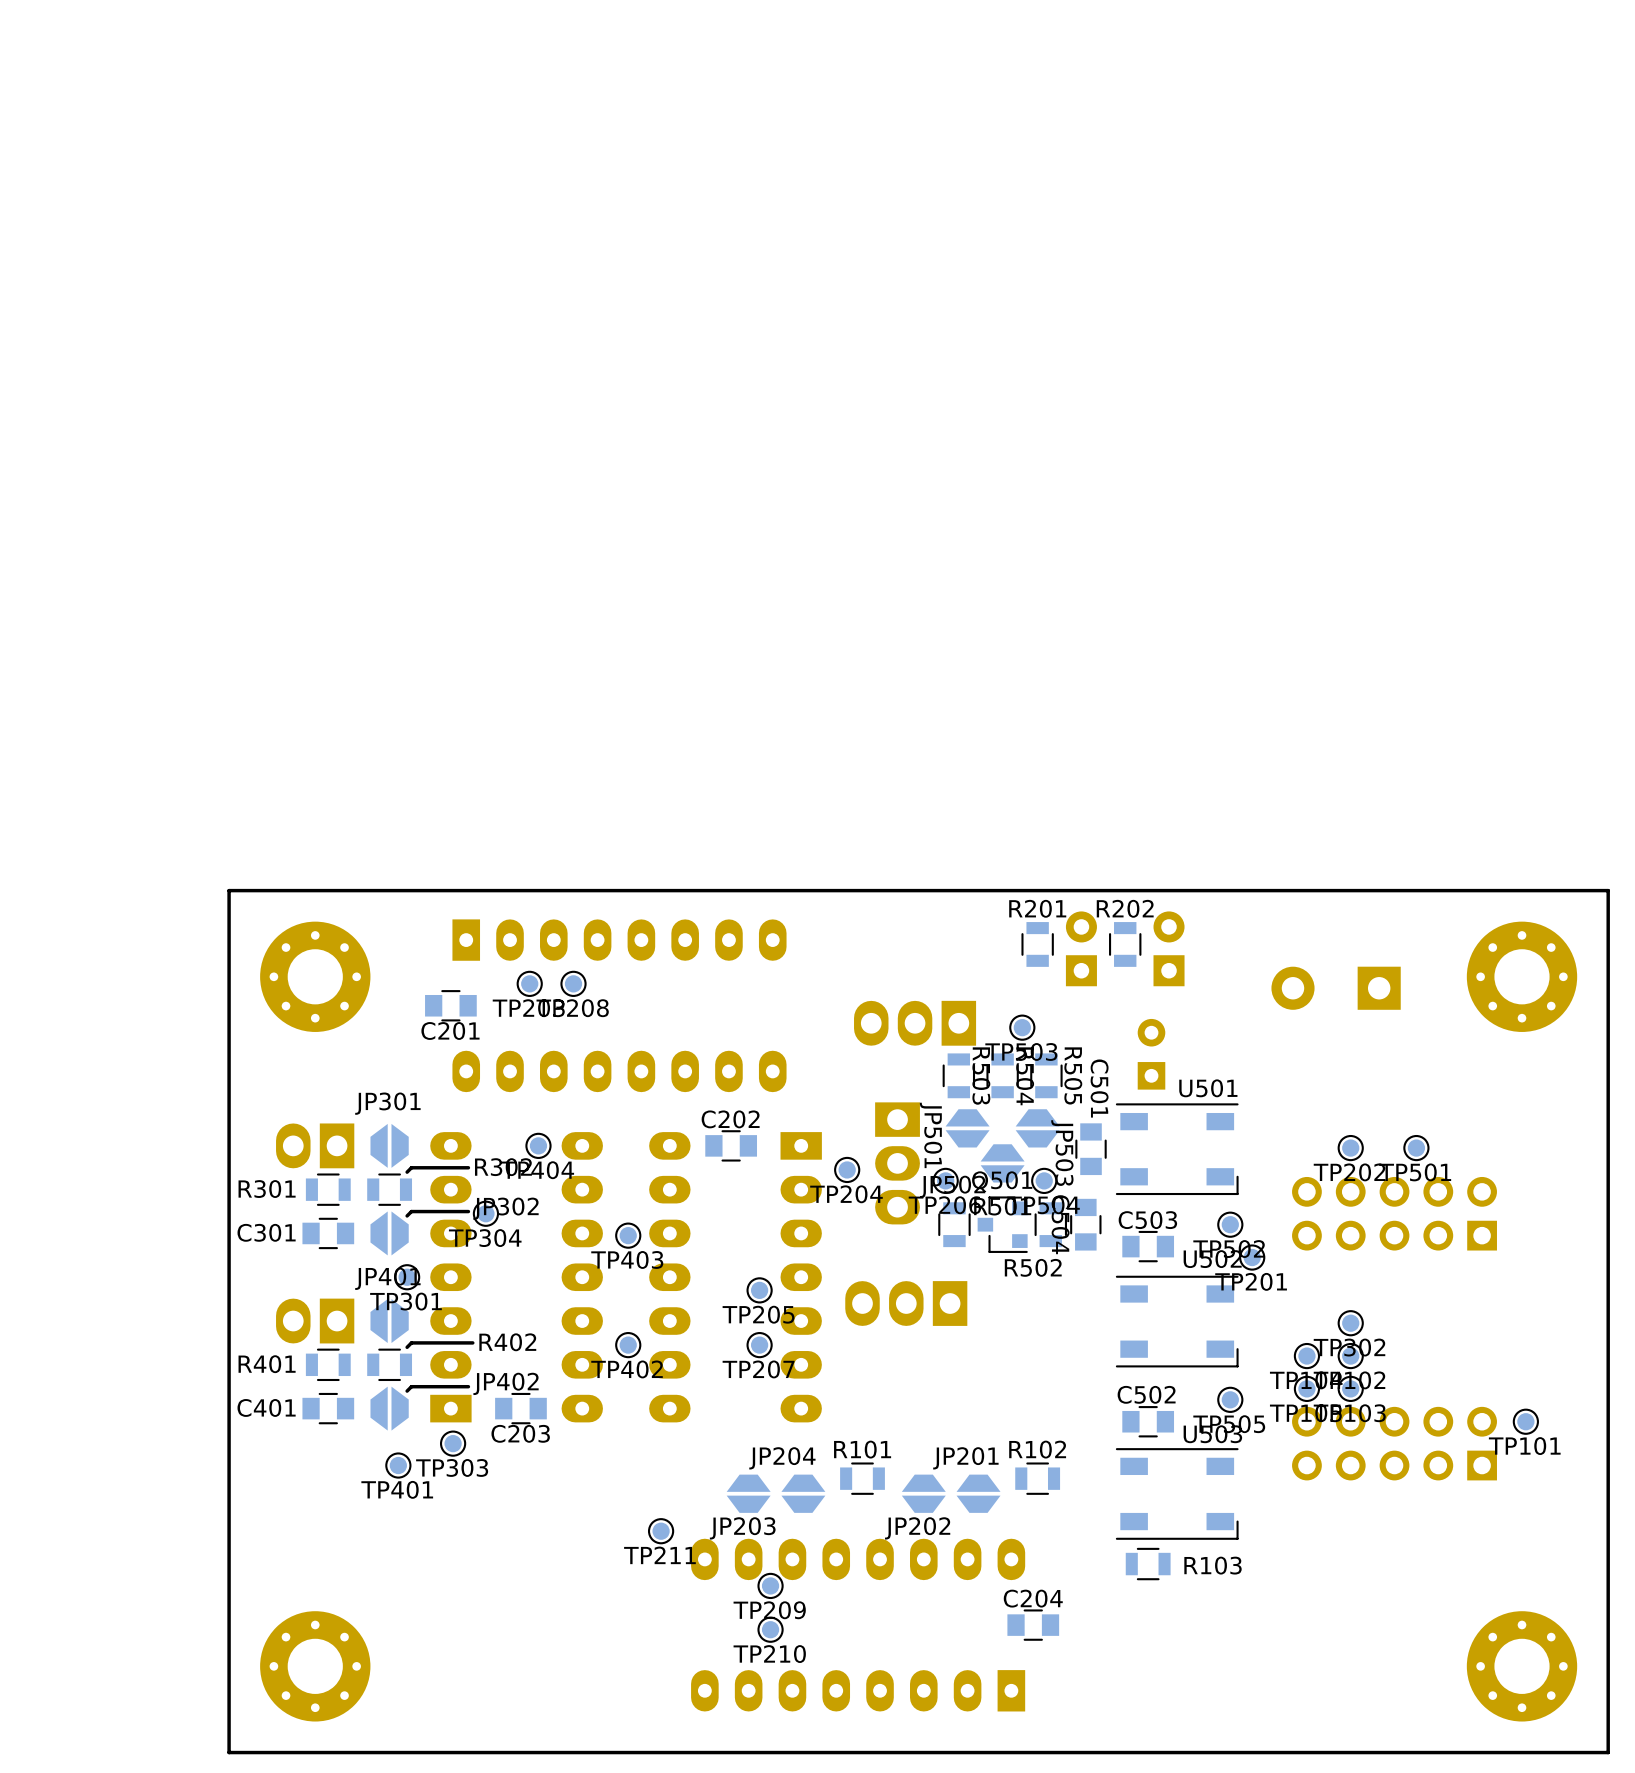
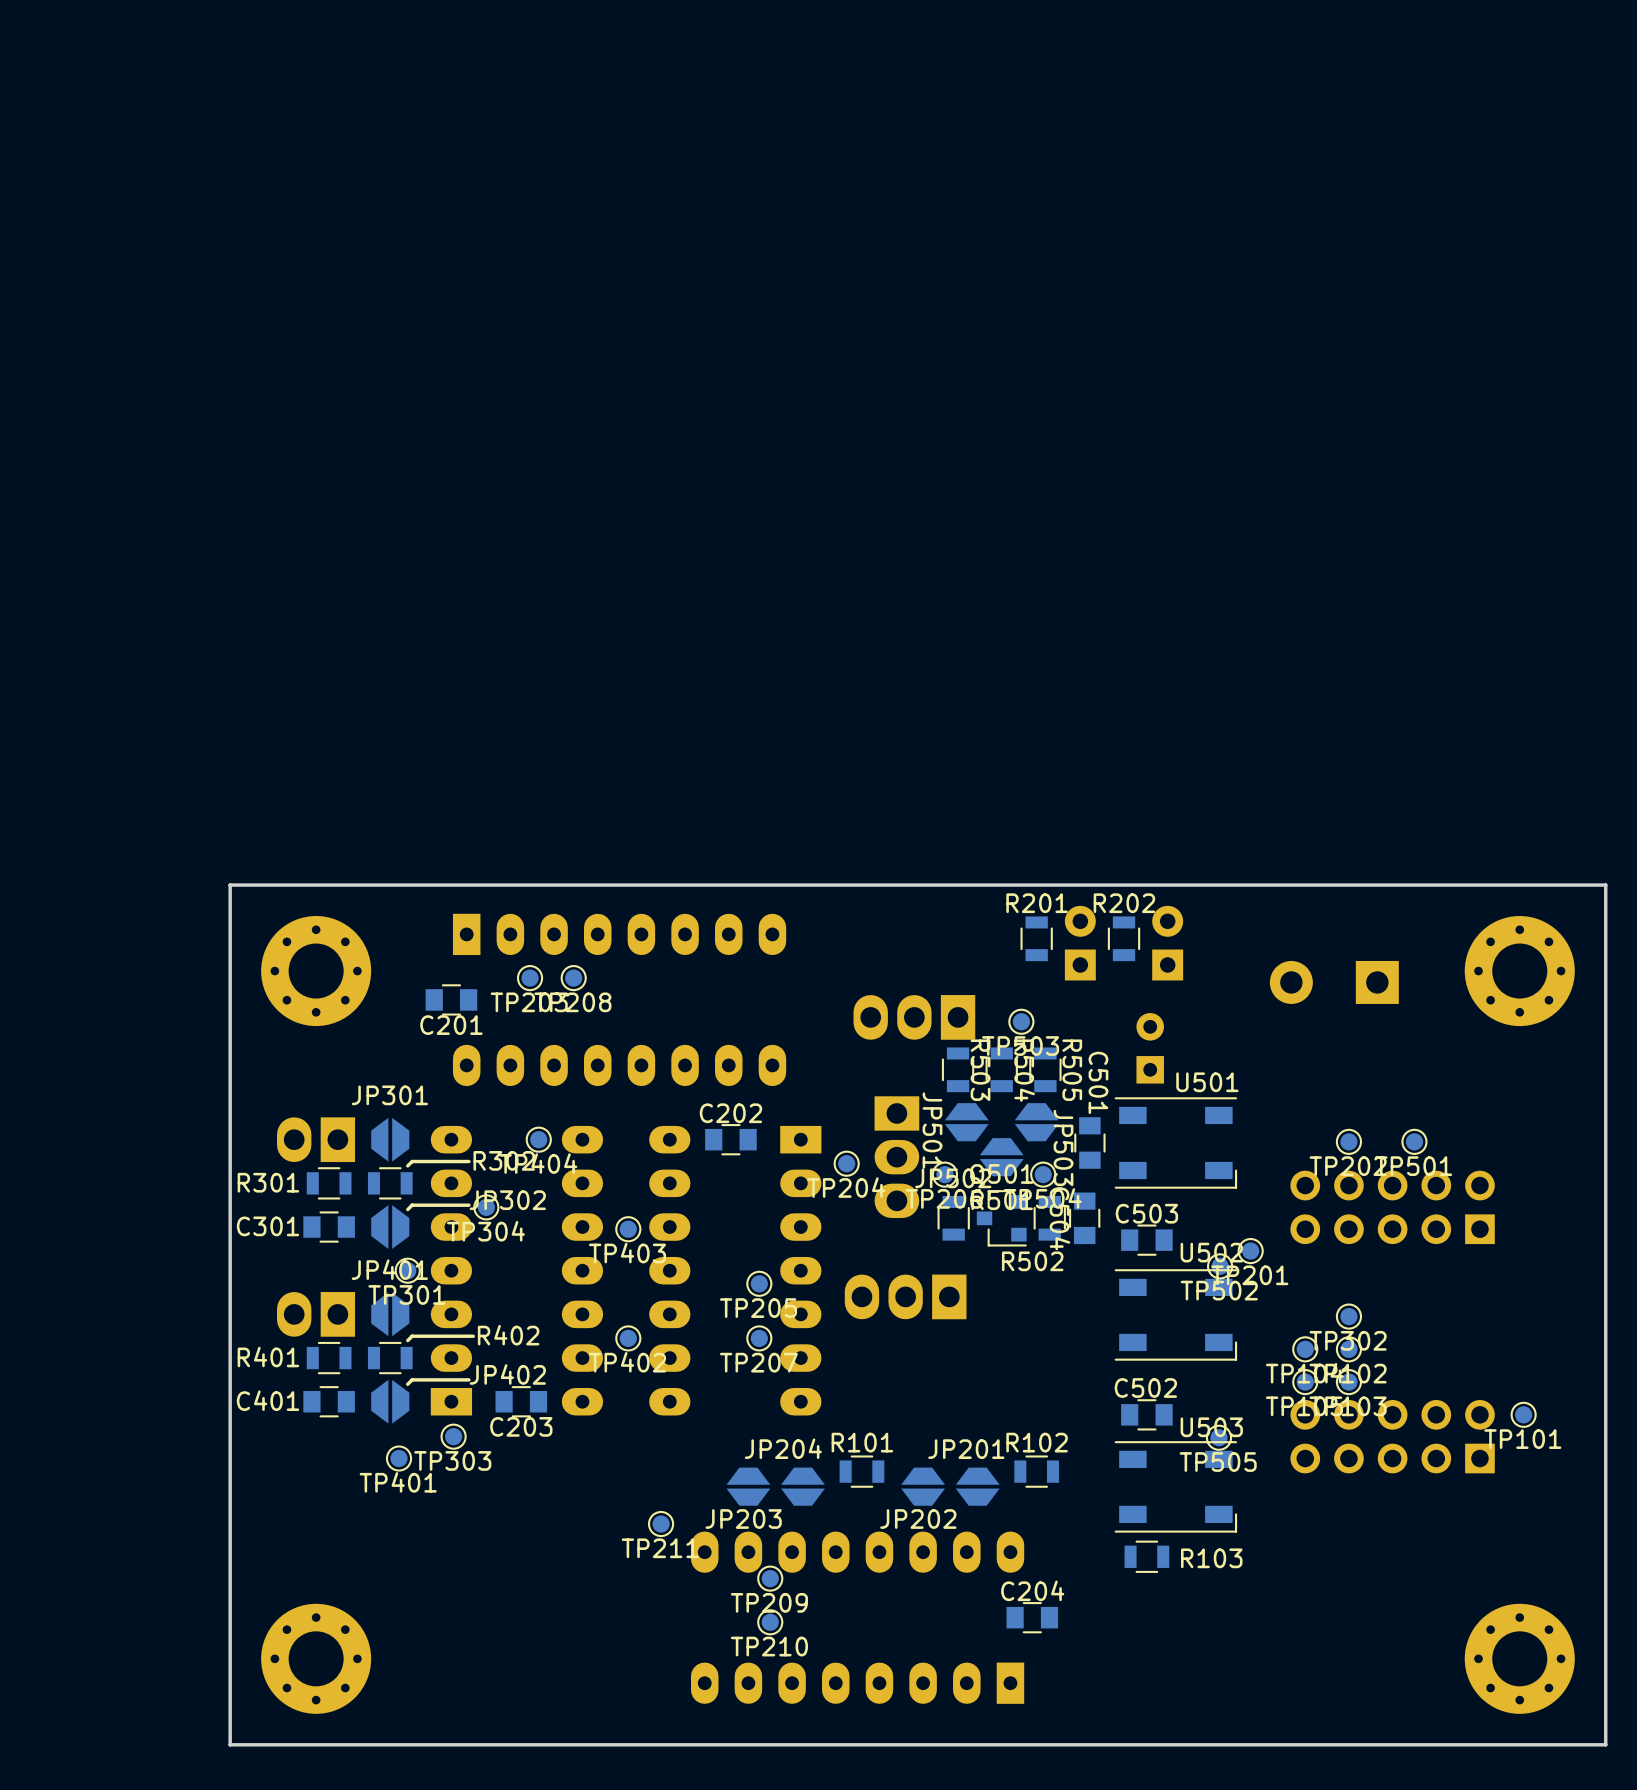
TP502 position: (1230, 1224) -> (1220, 1266)
TP505 position: (1230, 1399) -> (1219, 1437)

